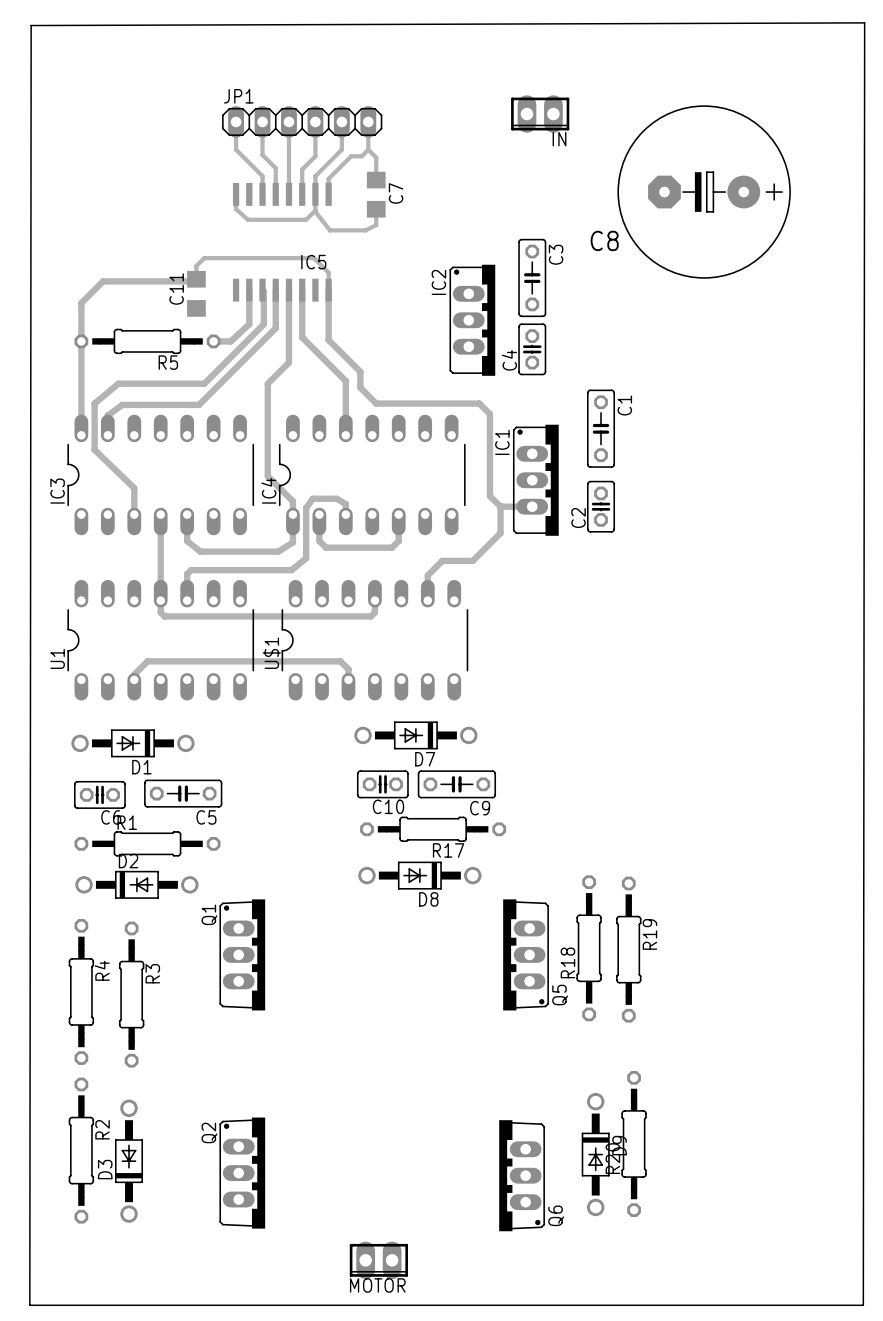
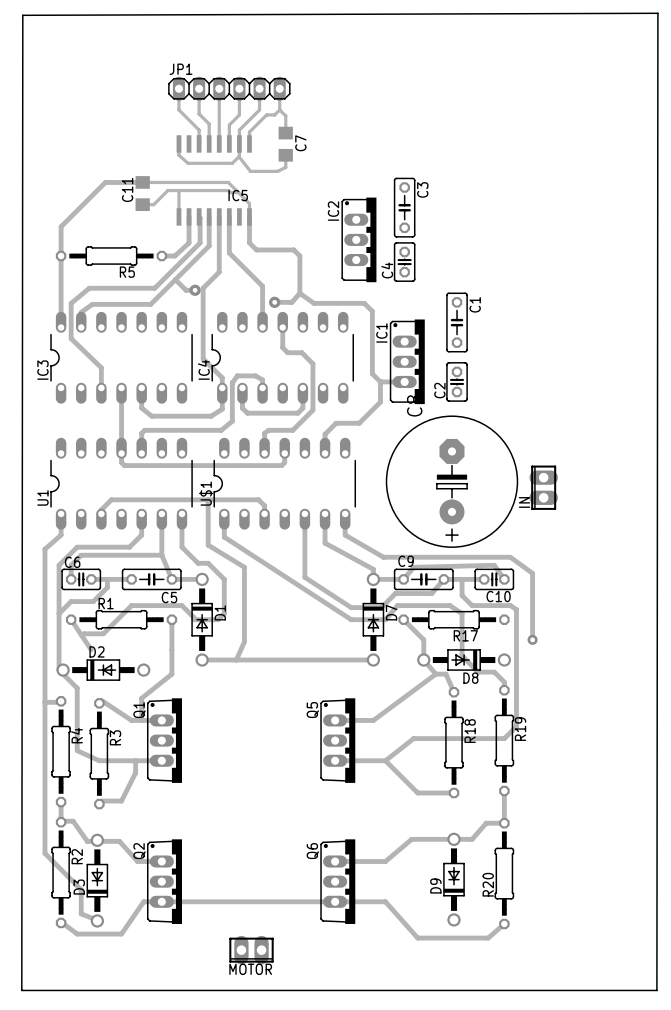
IN: (540, 114) -> none
C8 rotation: 0° (704, 192) -> 90° clockwise (451, 481)
C8 position: (704, 192) -> (451, 481)
track: none -> (178, 190) (178, 216)
track: (303, 258) (204, 258) (196, 266) (195, 281) (103, 281) -> (238, 192) (228, 182) (105, 182) (77, 210)
track: none -> (230, 192) (228, 190) (167, 190) (153, 204) (142, 204)
C11 position: (196, 293) -> (142, 193)
track: (328, 324) (328, 340) (360, 371) (360, 387) (376, 403) (413, 403) -> (249, 242) (256, 249) (293, 249) (299, 256) (299, 293)
track: none -> (175, 279) (186, 290) (195, 290)
via: none -> (195, 290)
track: none -> (299, 293) (313, 303)
track: none -> (299, 293) (291, 302) (274, 302)
via: none -> (274, 302)
track: none -> (282, 327) (282, 347) (287, 352) (301, 352) (312, 363) (312, 410) (292, 430) (268, 430) (264, 433) (264, 453)
IN: none -> (543, 487)
track: none -> (208, 499) (208, 545) (244, 567) (244, 641) (236, 660)
track: none -> (61, 513) (61, 535) (44, 549) (44, 853) (81, 889) (81, 913) (101, 921)
track: none -> (141, 513) (141, 535) (129, 547) (77, 547) (59, 565) (59, 670) (77, 688) (77, 750) (99, 760) (161, 760)
track: none -> (161, 513) (161, 555)
track: none -> (181, 513) (181, 547) (198, 563) (208, 563) (224, 579) (224, 613) (218, 619) (194, 619) (181, 605) (131, 605) (103, 633) (84, 633) (82, 635)
track: none -> (224, 513) (224, 537) (351, 619) (385, 619) (397, 605) (449, 605) (462, 613) (462, 655) (478, 672) (494, 672) (504, 682) (504, 690)
track: none -> (304, 513) (304, 577) (351, 607) (381, 607) (395, 593) (431, 593) (443, 579) (484, 579)
track: none -> (325, 513) (325, 543) (373, 569) (373, 579) (403, 579) (413, 567) (494, 565) (504, 579)
track: none -> (345, 513) (345, 535) (383, 557) (510, 557) (532, 573) (532, 639)
track: none -> (161, 555) (171, 579) (202, 579)
track: none -> (161, 555) (81, 555) (71, 565) (71, 579)
D7 rotation: 0° (415, 735) -> 90° counterclockwise (373, 619)
D7 position: (415, 735) -> (373, 619)
D1 rotation: 0° (132, 743) -> 90° counterclockwise (202, 619)
D1 position: (132, 743) -> (202, 619)
track: none -> (91, 579) (131, 579)
track: none -> (107, 579) (107, 587) (93, 601) (71, 601) (59, 613)
track: none -> (462, 579) (462, 595) (472, 605) (510, 605) (516, 609) (516, 726) (504, 738) (413, 738) (385, 760)
C10 position: (382, 784) -> (494, 579)
C9 rotation: 0° (456, 784) -> 180° (423, 579)
C9 position: (456, 784) -> (423, 579)
C5 position: (183, 793) -> (151, 579)
C6 position: (99, 794) -> (81, 579)
C6 name position: C6 (111, 817) -> C6 (72, 562)
track: none -> (71, 619) (91, 649)
track: none -> (171, 619) (171, 674) (141, 698) (141, 720)
track: none -> (403, 619) (423, 639) (423, 660) (435, 674)
R17 position: (433, 829) -> (454, 619)
R1 position: (147, 843) -> (121, 619)
via: none -> (532, 639)
track: none -> (202, 660) (373, 660)
D8 position: (419, 875) -> (464, 660)
track: none -> (435, 674) (445, 674) (454, 692)
track: none -> (435, 674) (373, 720) (335, 720)
track: none -> (61, 700) (59, 702) (44, 702)
track: none -> (101, 700) (131, 720) (161, 720)
R18 position: (589, 948) -> (454, 742)
R19 position: (628, 949) -> (504, 740)
Q1 position: (242, 954) -> (164, 740)
Q5 rotation: 0° (526, 954) -> 180° (337, 740)
Q5 position: (526, 954) -> (337, 740)
R18 name position: R18 (567, 962) -> R18 (470, 731)
track: none -> (135, 760) (135, 772) (121, 801) (101, 801)
track: none -> (335, 760) (385, 760)
track: none -> (385, 760) (417, 792) (454, 792)
track: none -> (504, 790) (504, 823) (486, 823) (472, 839) (411, 839) (385, 861) (335, 861)
track: none -> (61, 801) (61, 821) (73, 821) (87, 841) (119, 841) (137, 861) (161, 861)
R20 position: (634, 1143) -> (504, 873)
D9 rotation: 0° (595, 1154) -> 180° (454, 879)
Q2 position: (242, 1173) -> (164, 881)
Q6 rotation: 0° (522, 1175) -> 180° (337, 881)
Q6 position: (522, 1175) -> (337, 881)
track: none -> (61, 921) (77, 934) (121, 934) (143, 901) (385, 901) (417, 938) (488, 938) (504, 923)
MOTOR position: (378, 1260) -> (251, 950)

